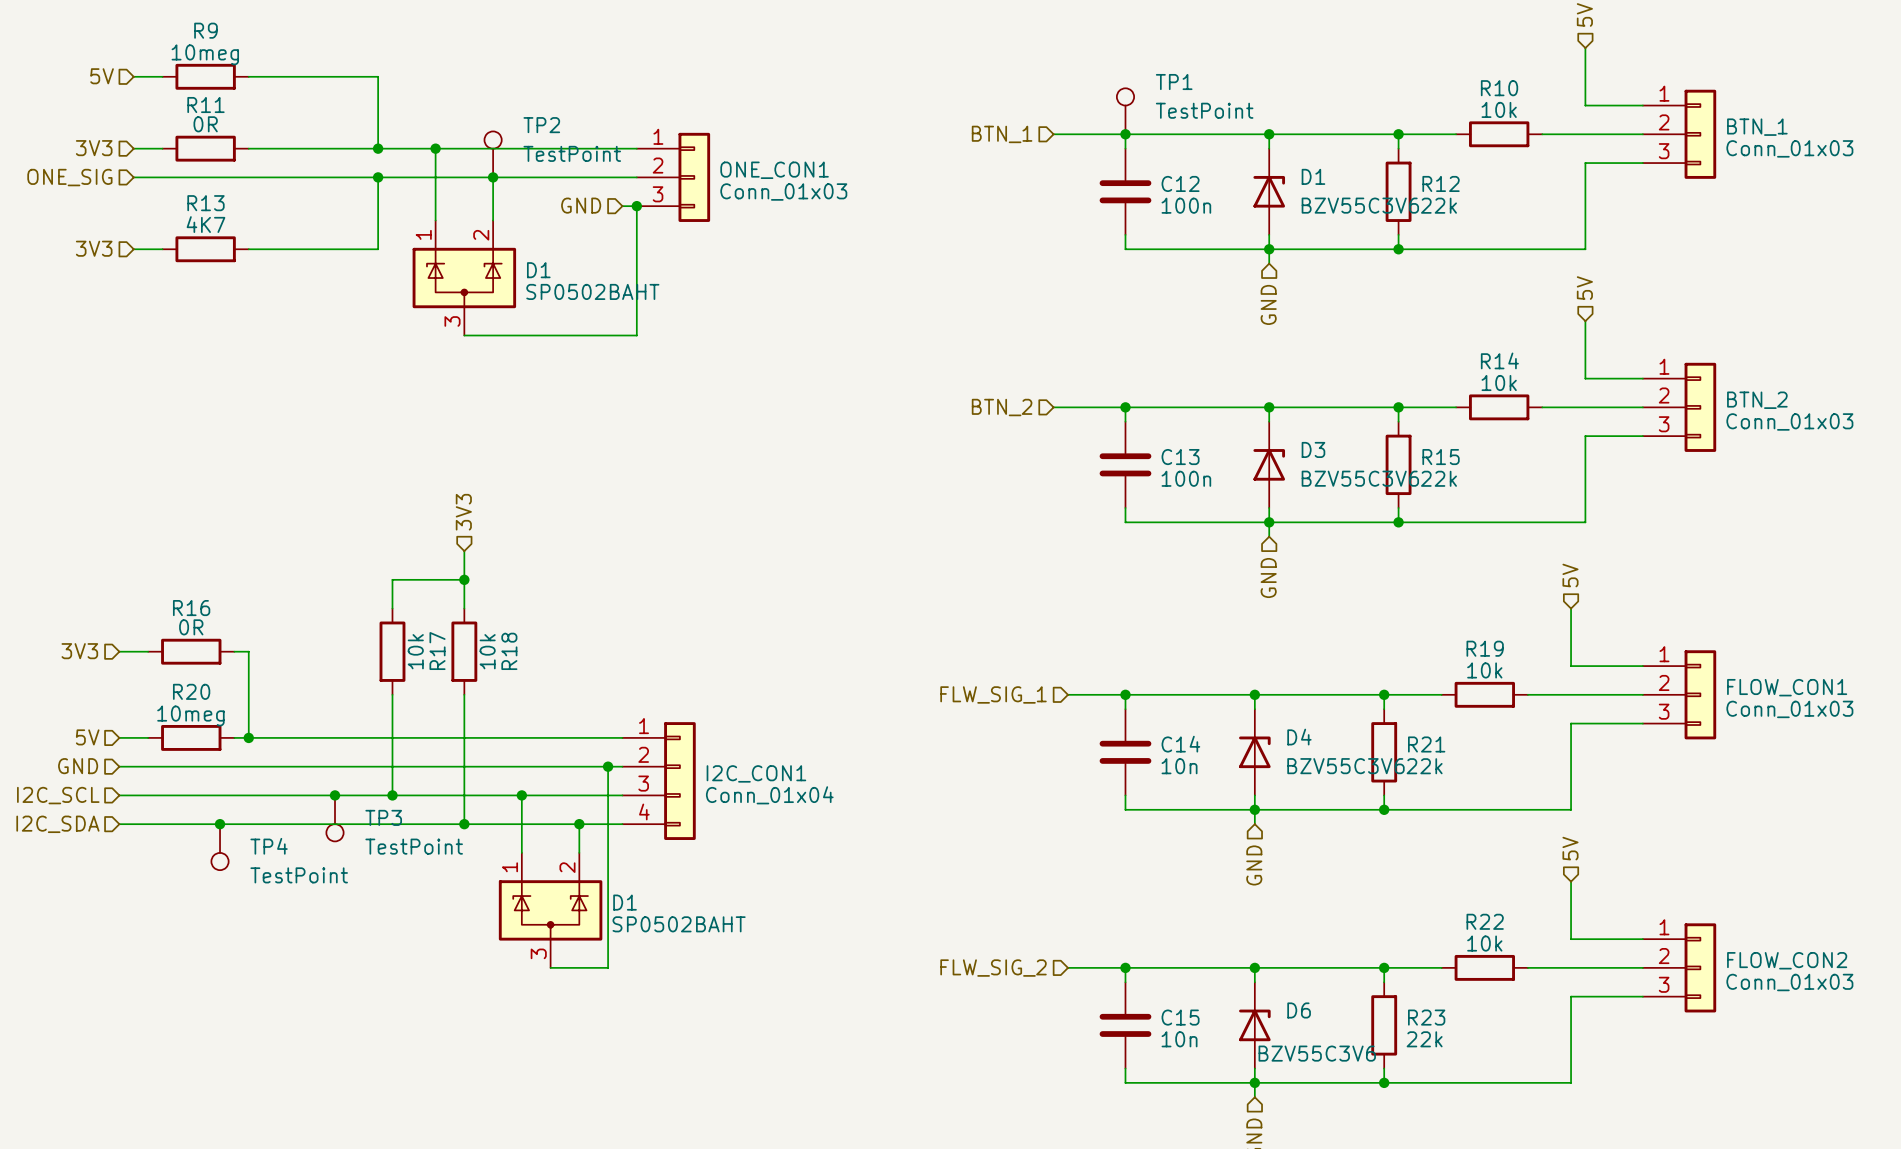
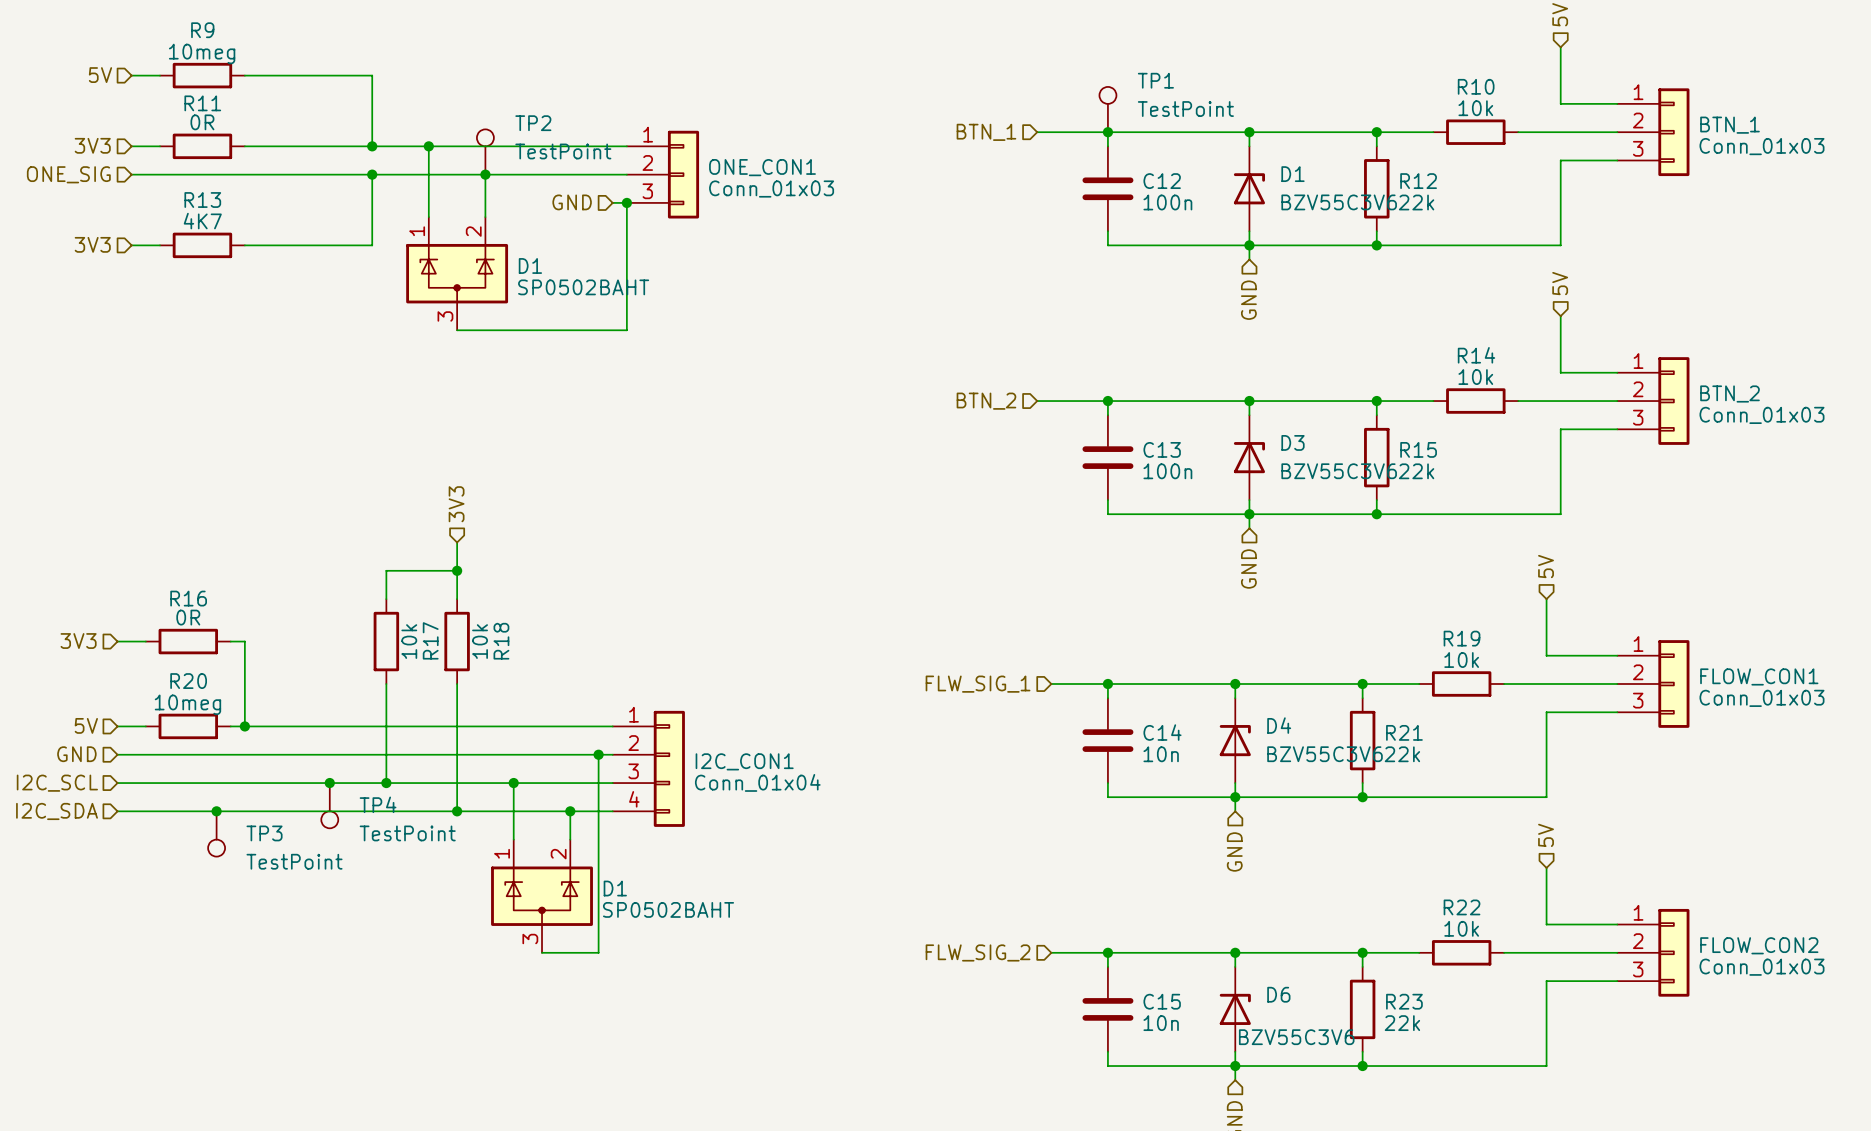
TP3 name: TP3 (383, 817) -> TP4 (378, 804)
TP4 name: TP4 (269, 846) -> TP3 (264, 833)

